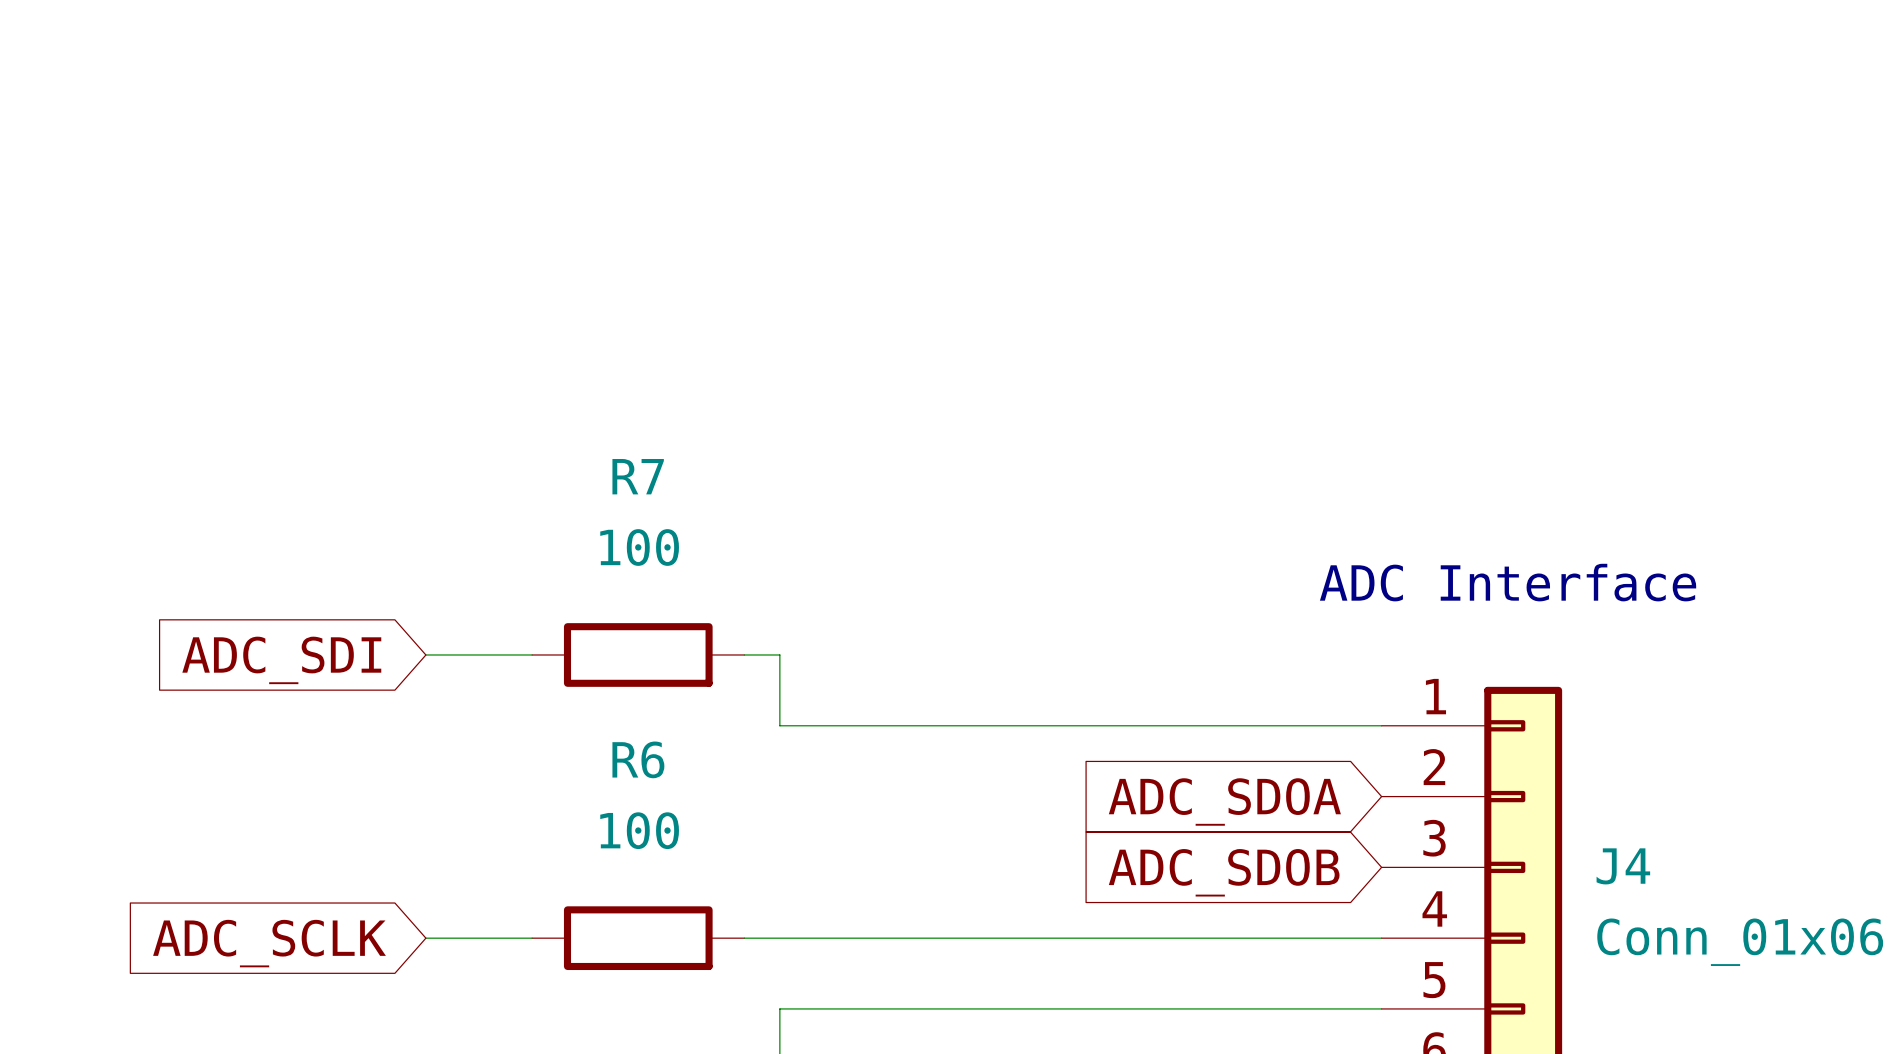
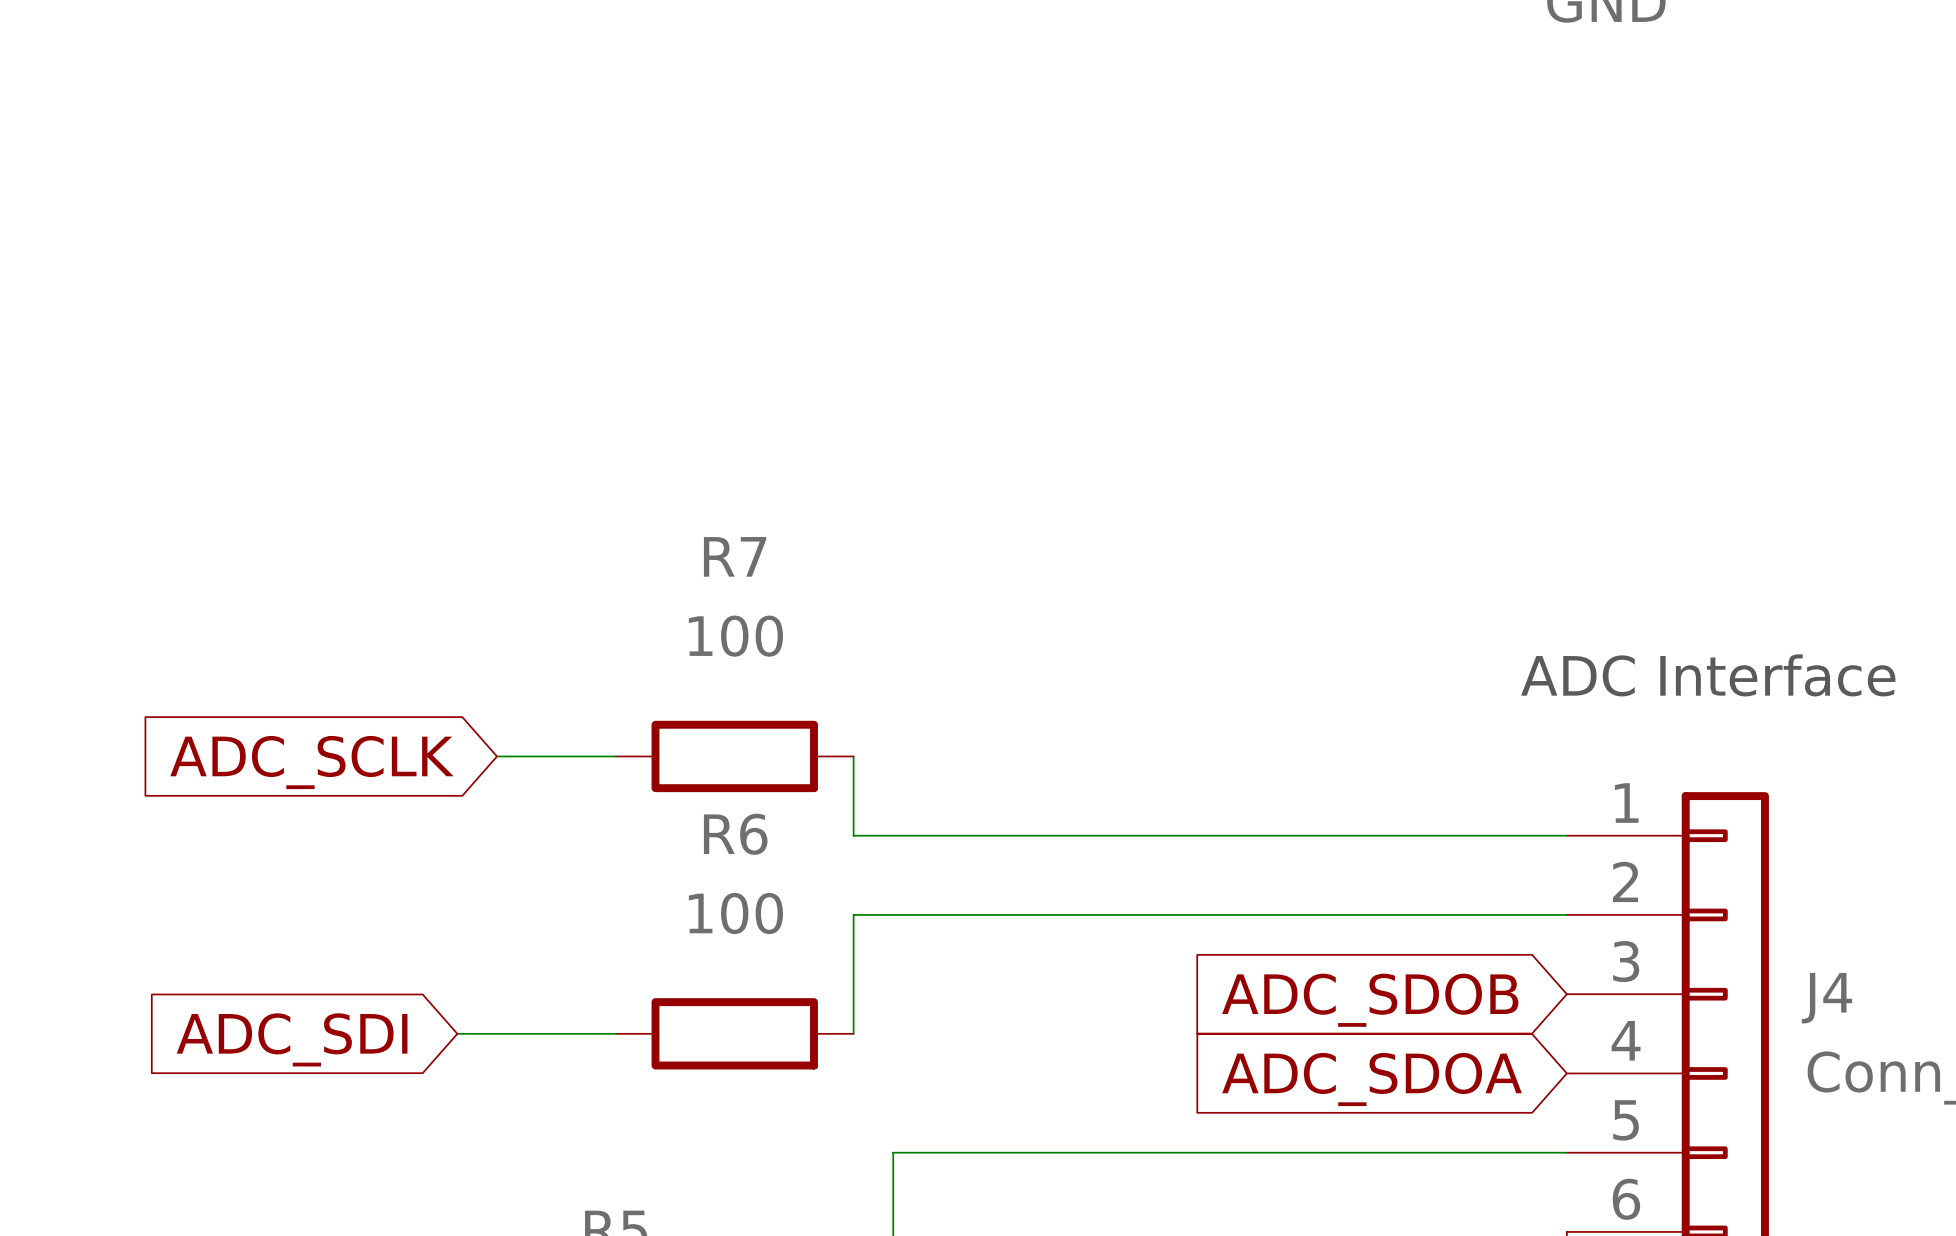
wire: (744, 654) (779, 654) (779, 725) -> (853, 756) (853, 835) (893, 835)
global label: ADC_SDI (281, 660) -> ADC_SCLK (311, 762)
wire: none -> (1566, 914) (853, 914) (853, 1033)
global label position: ADC_SDOA (1224, 801) -> ADC_SDOA (1372, 1079)
wire: none -> (457, 1033) (615, 1033)
wire: (425, 938) (532, 938) -> none
R6 position: (638, 938) -> (734, 1033)
wire: (744, 938) (1381, 938) -> none
global label: ADC_SCLK (269, 943) -> ADC_SDI (292, 1039)

